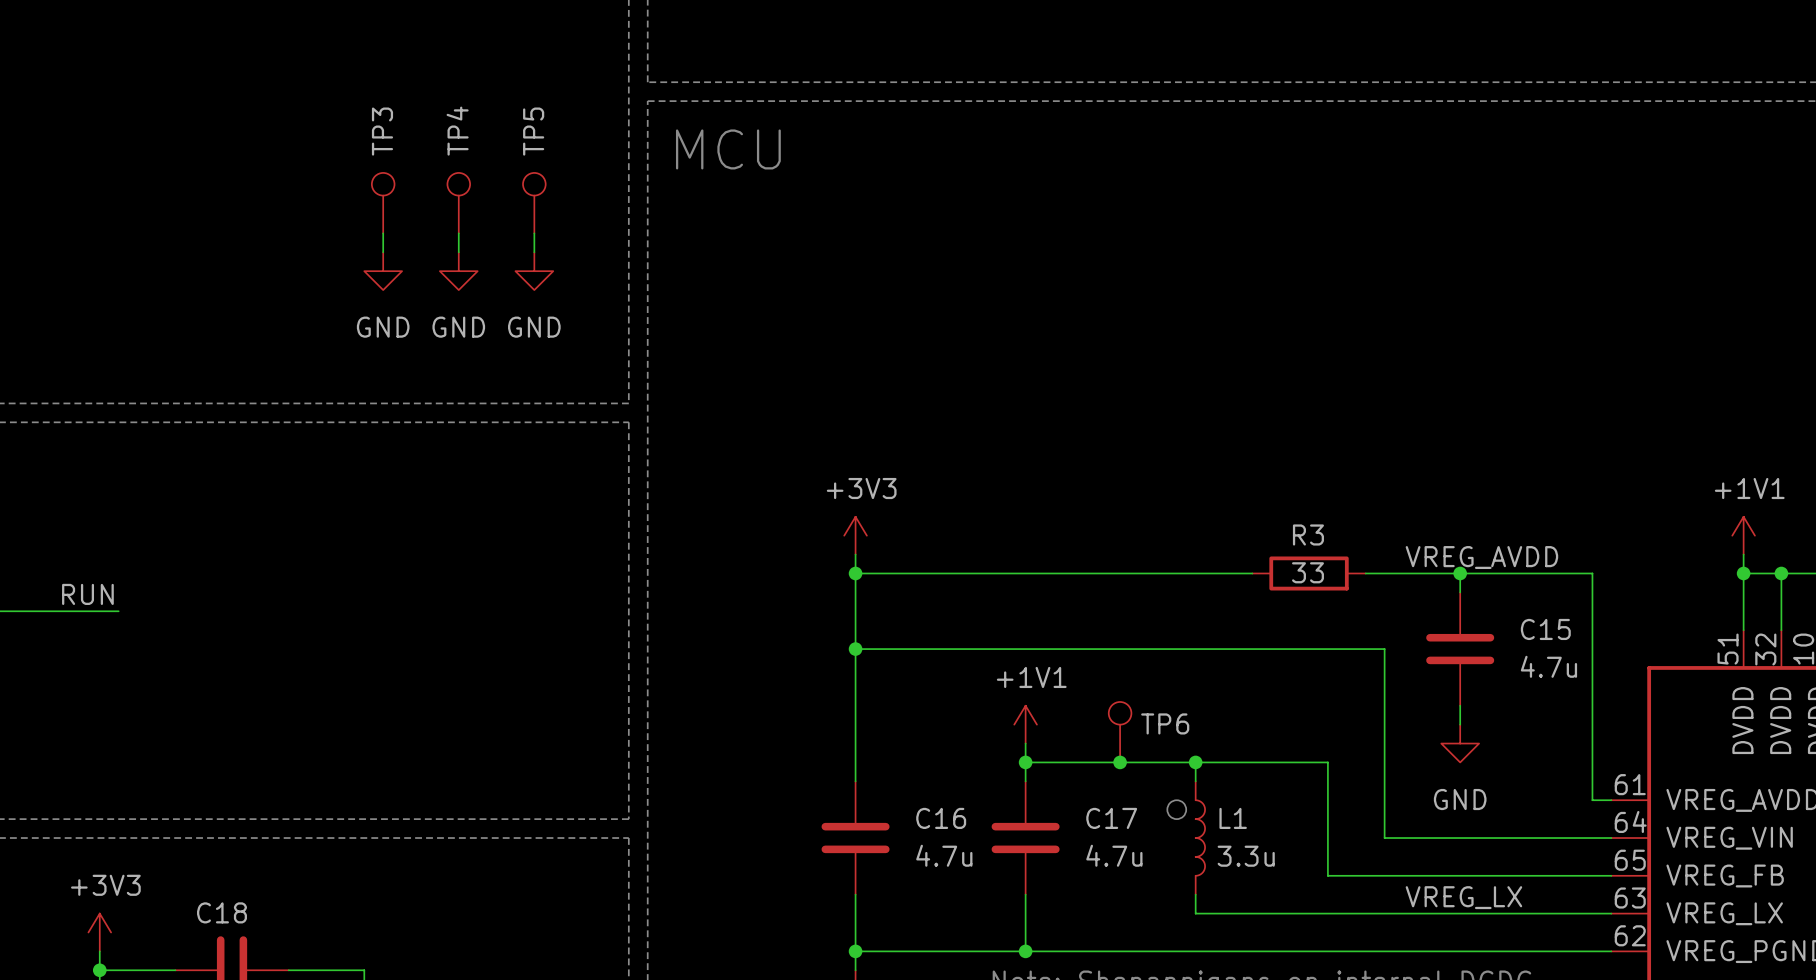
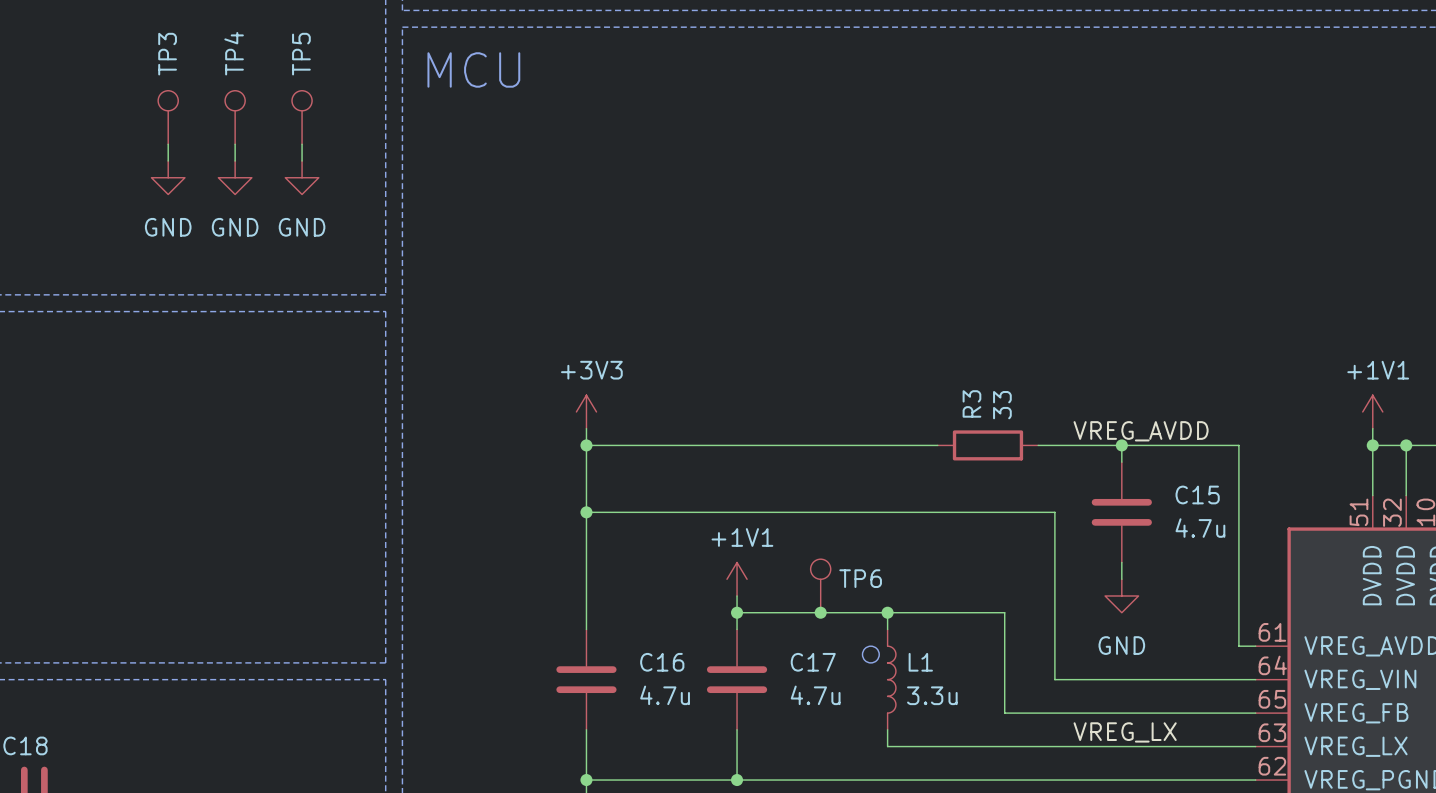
R3 name rotation: 0° (1308, 534) -> 90° counterclockwise (971, 403)
R3 value rotation: 0° (1307, 572) -> 90° counterclockwise (1002, 405)
R3 value position: 33 (1307, 572) -> 33 (1002, 405)

